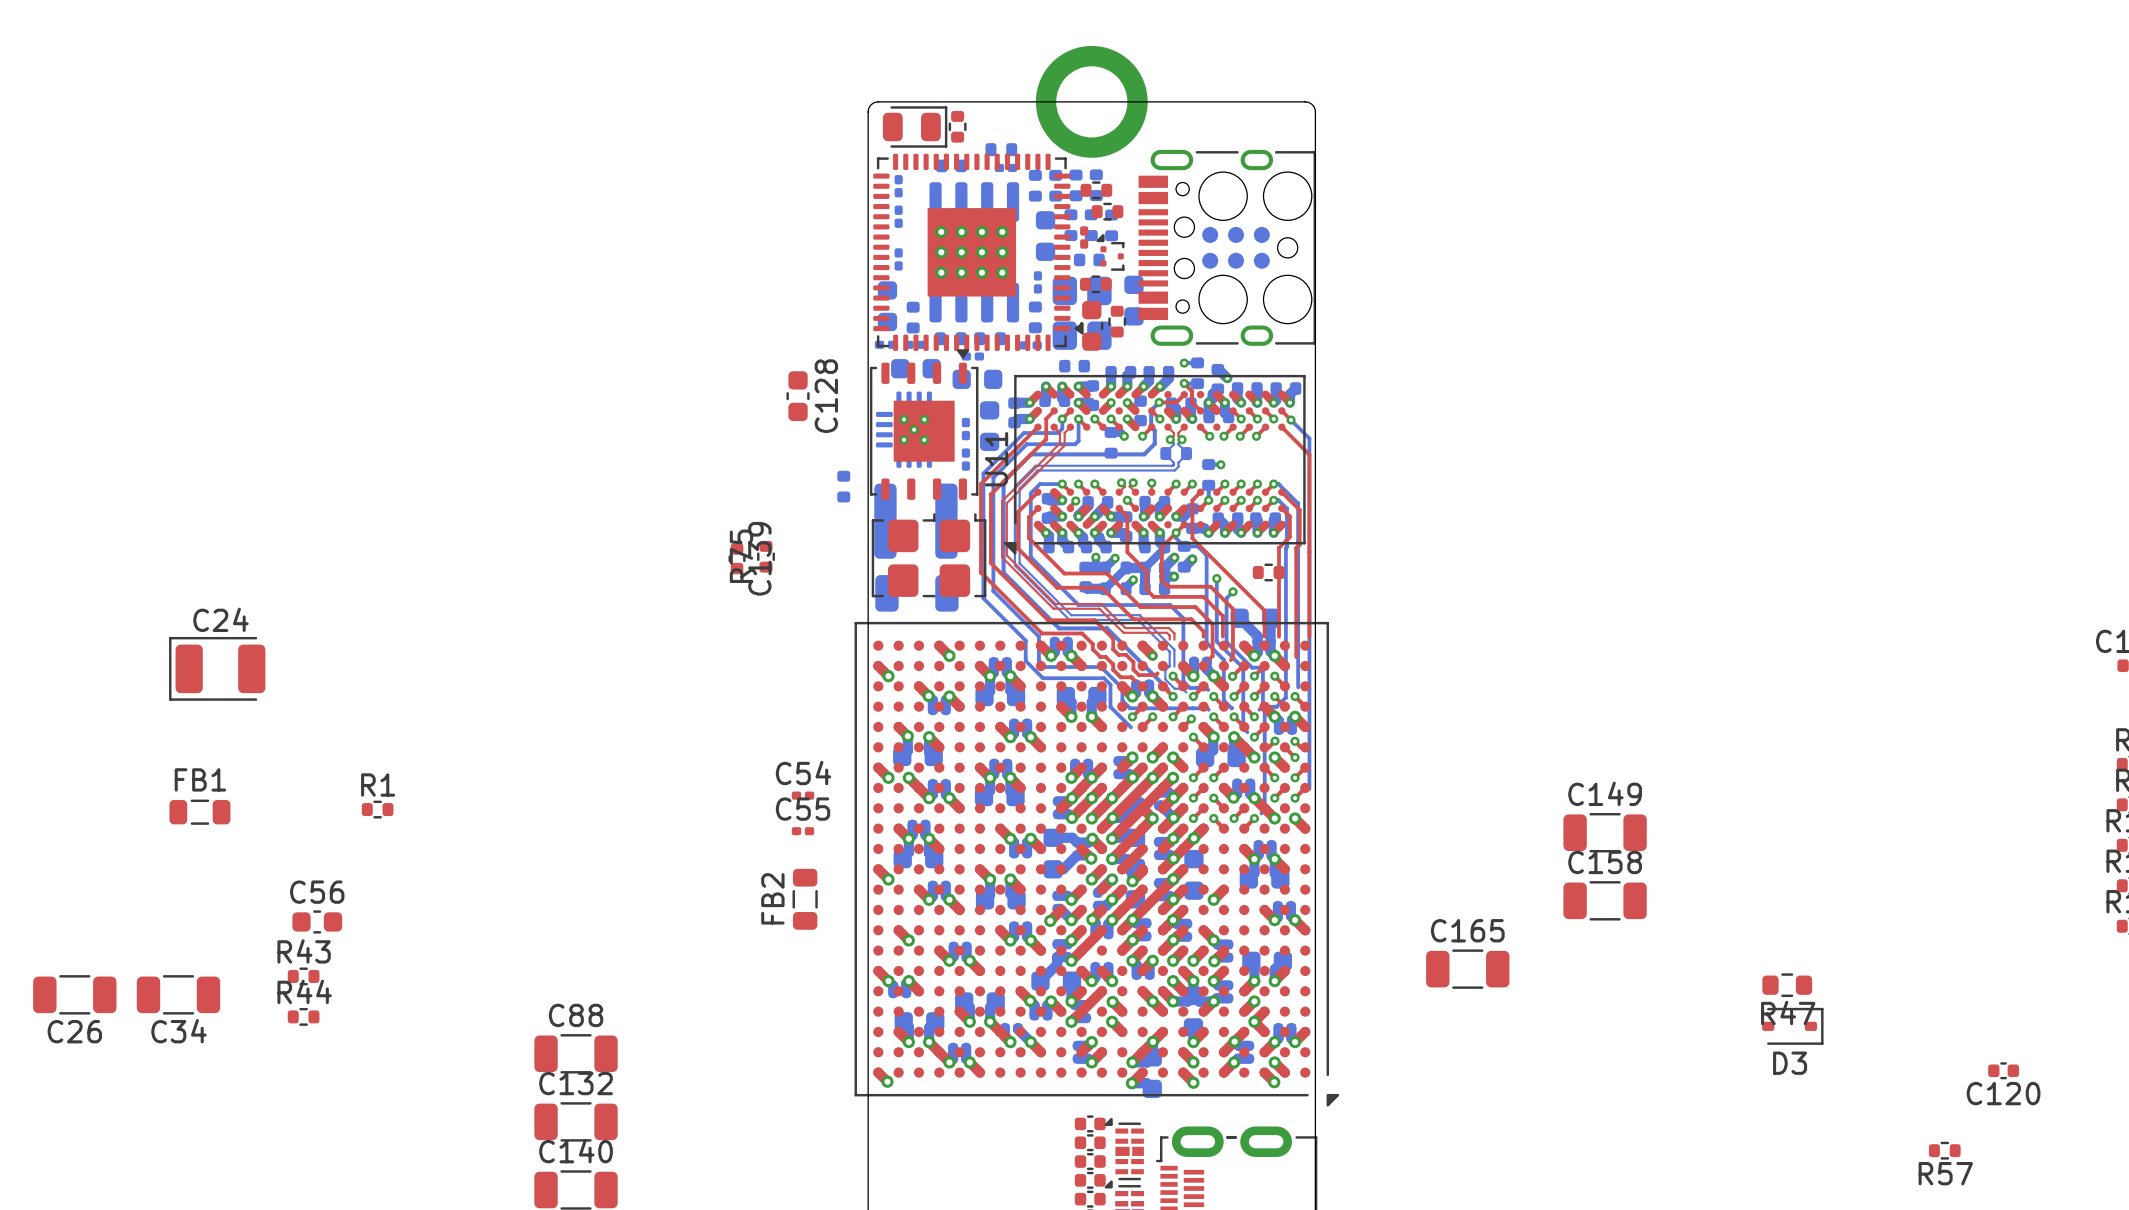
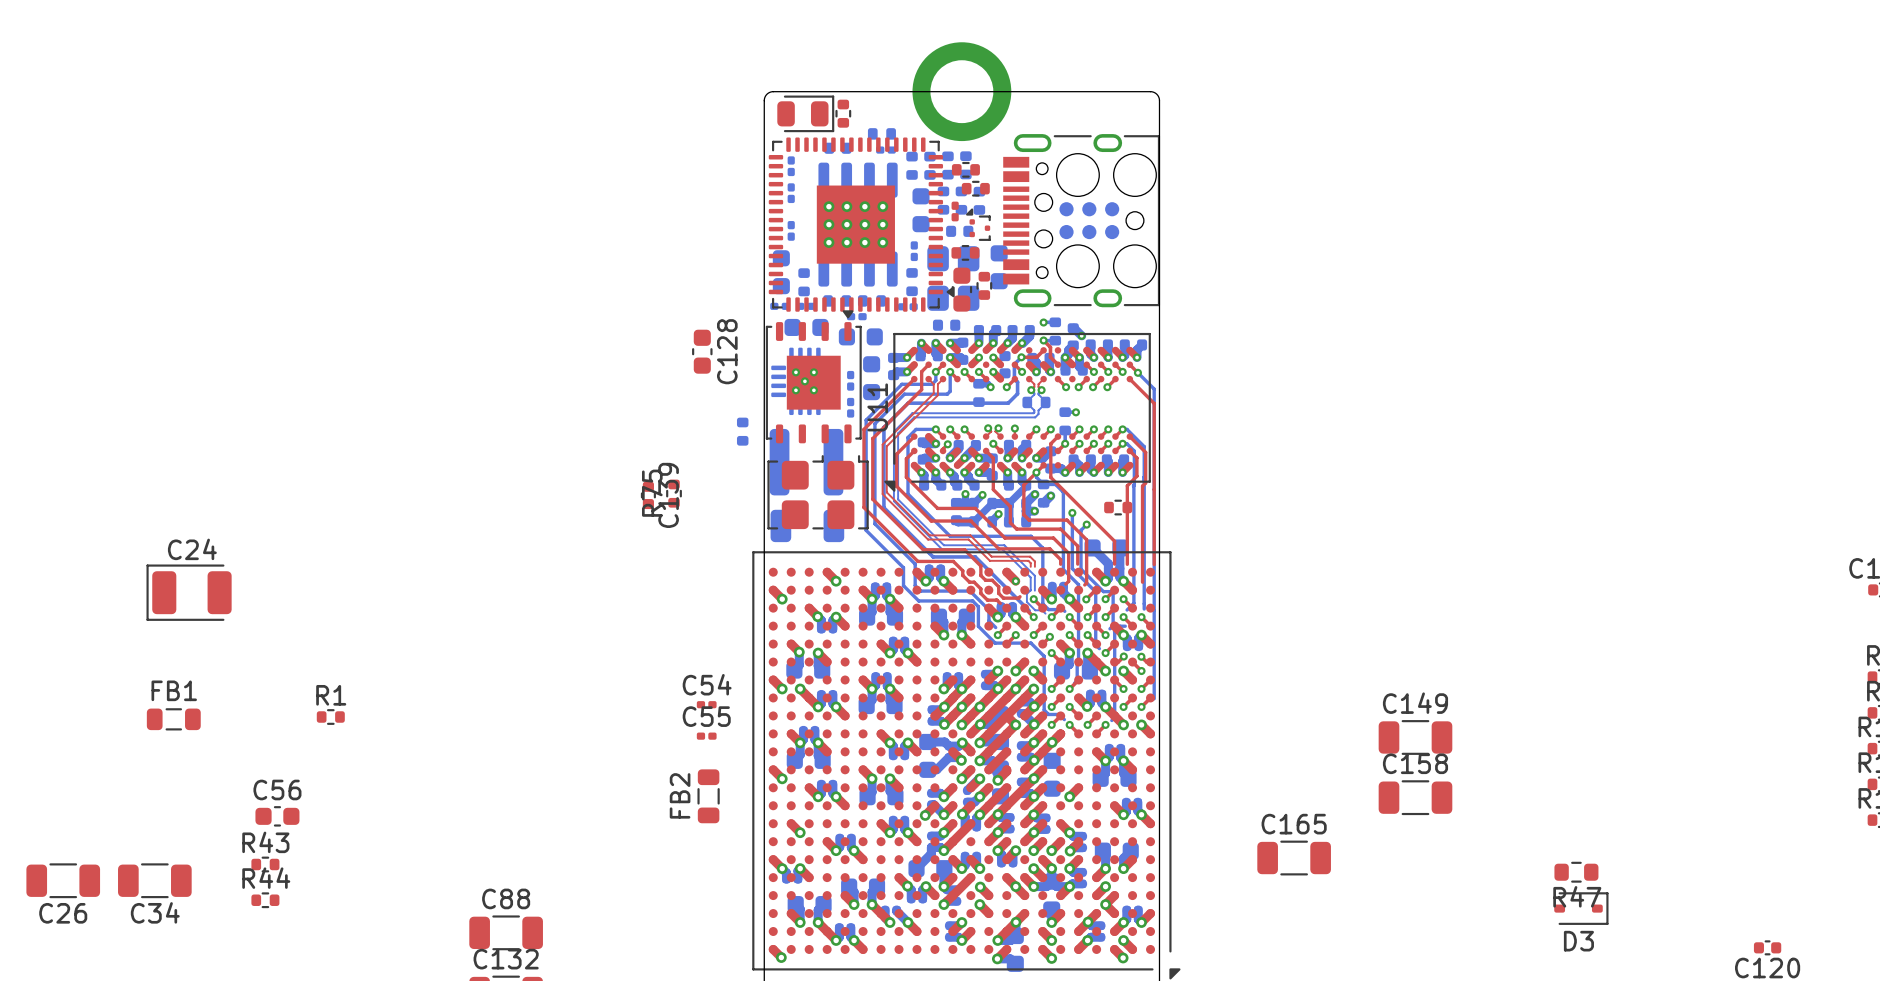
bottom track: (1285, 548) (1285, 697) (1276, 706) -> (1133, 485) (1133, 603) (1127, 610)
bottom track: (1223, 700) (1231, 708) -> (1078, 620) (1078, 663) (1077, 680) (1074, 683)
bottom track: (1130, 708) (1208, 709) -> none
bottom track: (1129, 725) (1130, 727) -> (995, 643) (1030, 643) (1044, 656) (1044, 710) (1048, 714) (1059, 714) (1064, 719)

